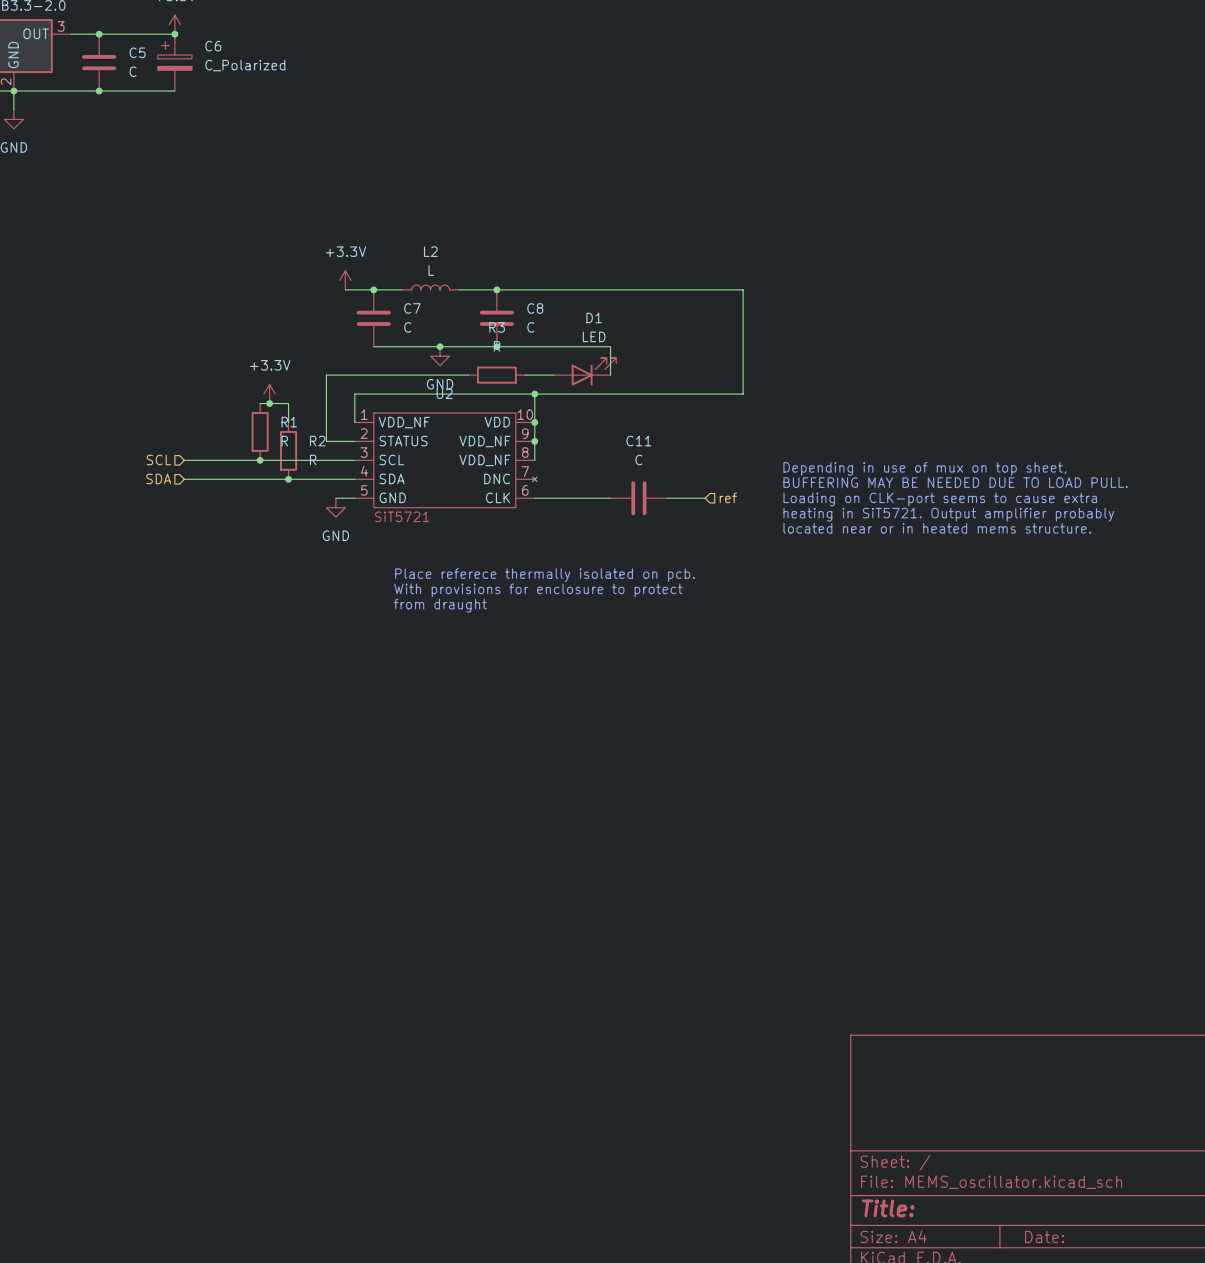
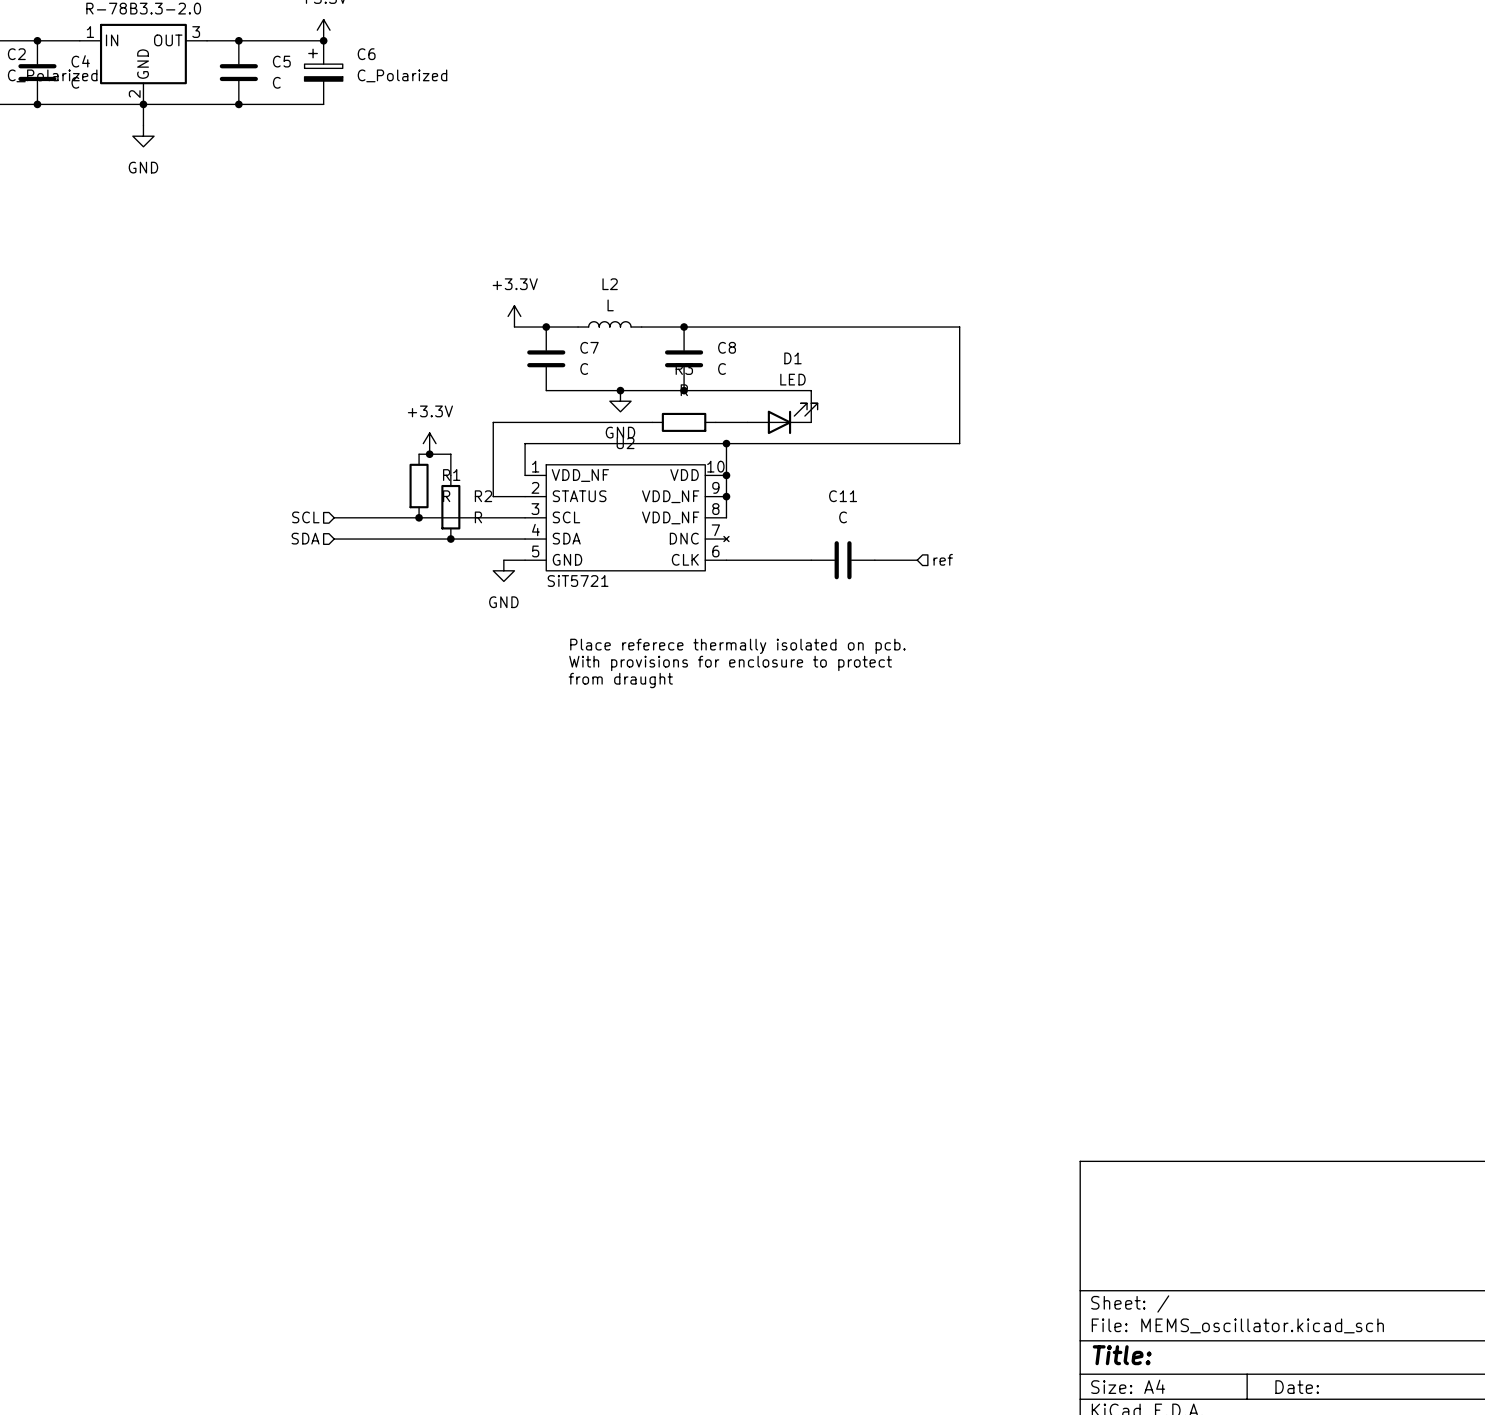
text: Depending in use of mux on top sheet, (924, 468) -> none
text: BUFFERING MAY BE NEEDED DUE TO LOAD PULL. (955, 482) -> none
text: Loading on CLK-port seems to cause extra (940, 499) -> none
text: heating in SiT5721. Output amplifier probably (948, 514) -> none
text: located near or in heated mems structure. (937, 528) -> none

